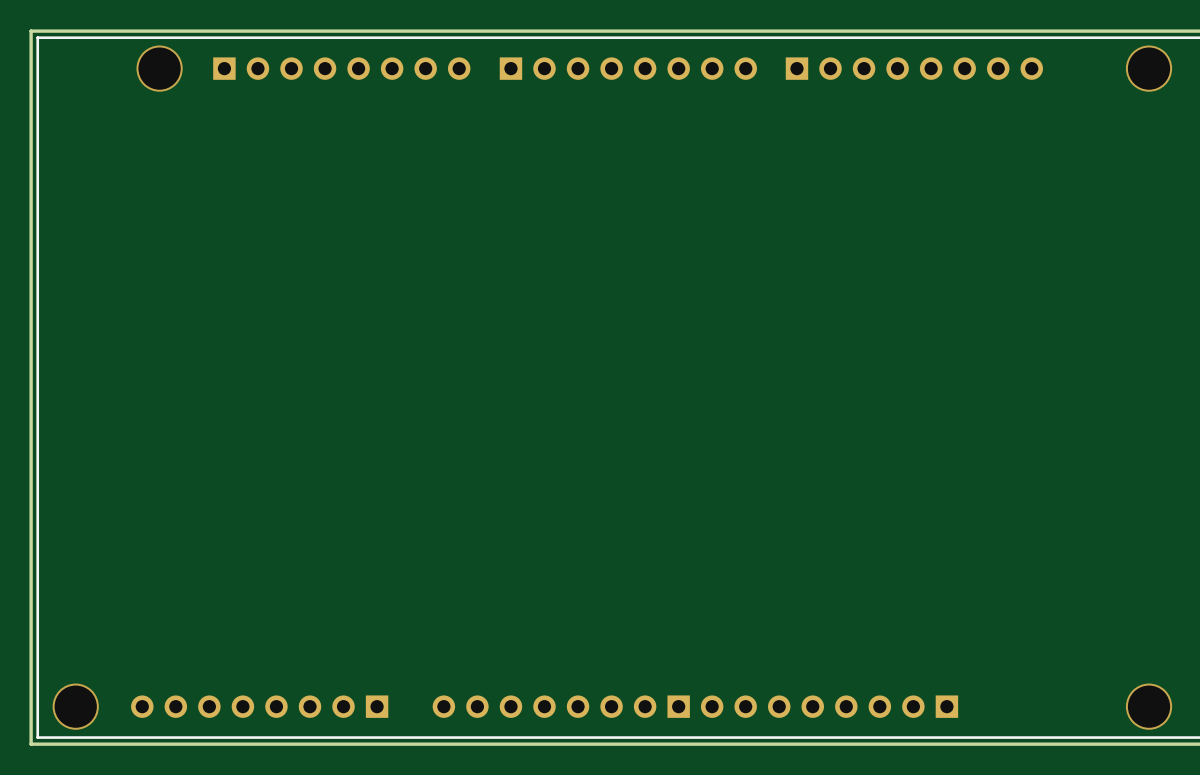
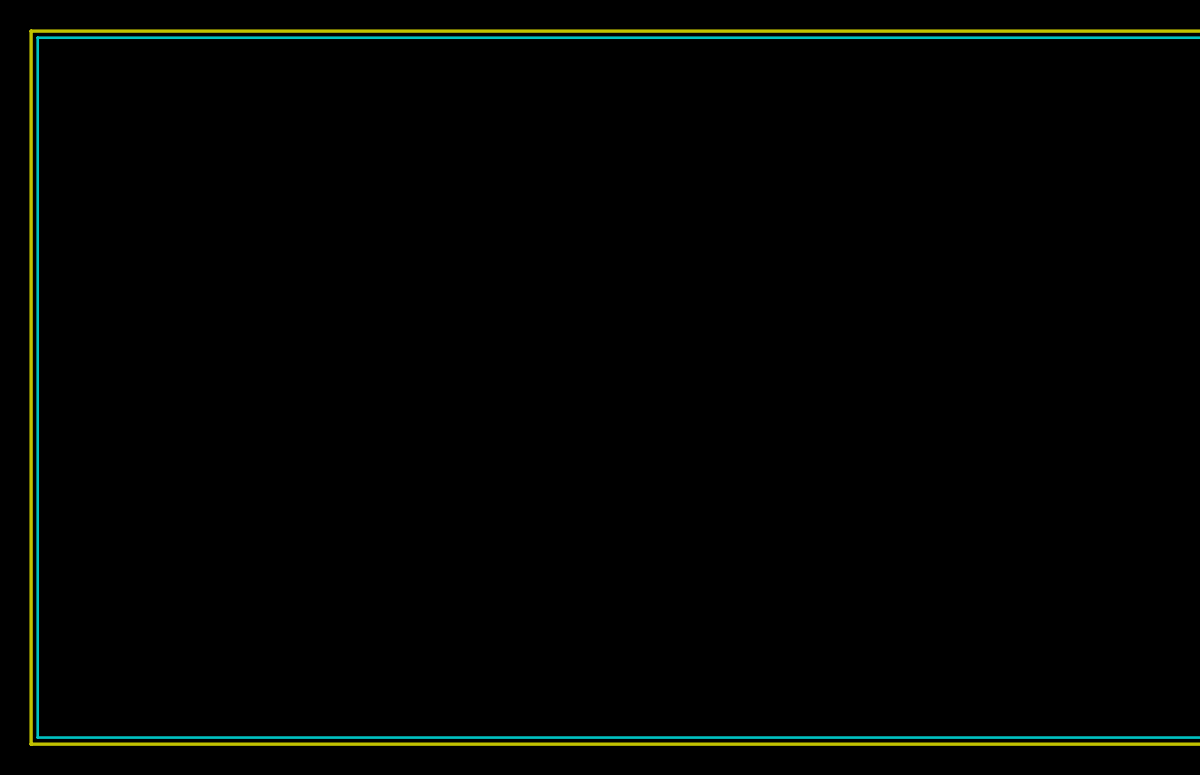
via: (159, 68) -> none
part: (341, 68) -> none
part: (628, 68) -> none
part: (914, 68) -> none
via: (1149, 68) -> none
via: (75, 706) -> none
part: (259, 706) -> none
part: (561, 706) -> none
part: (829, 706) -> none
via: (1149, 706) -> none

